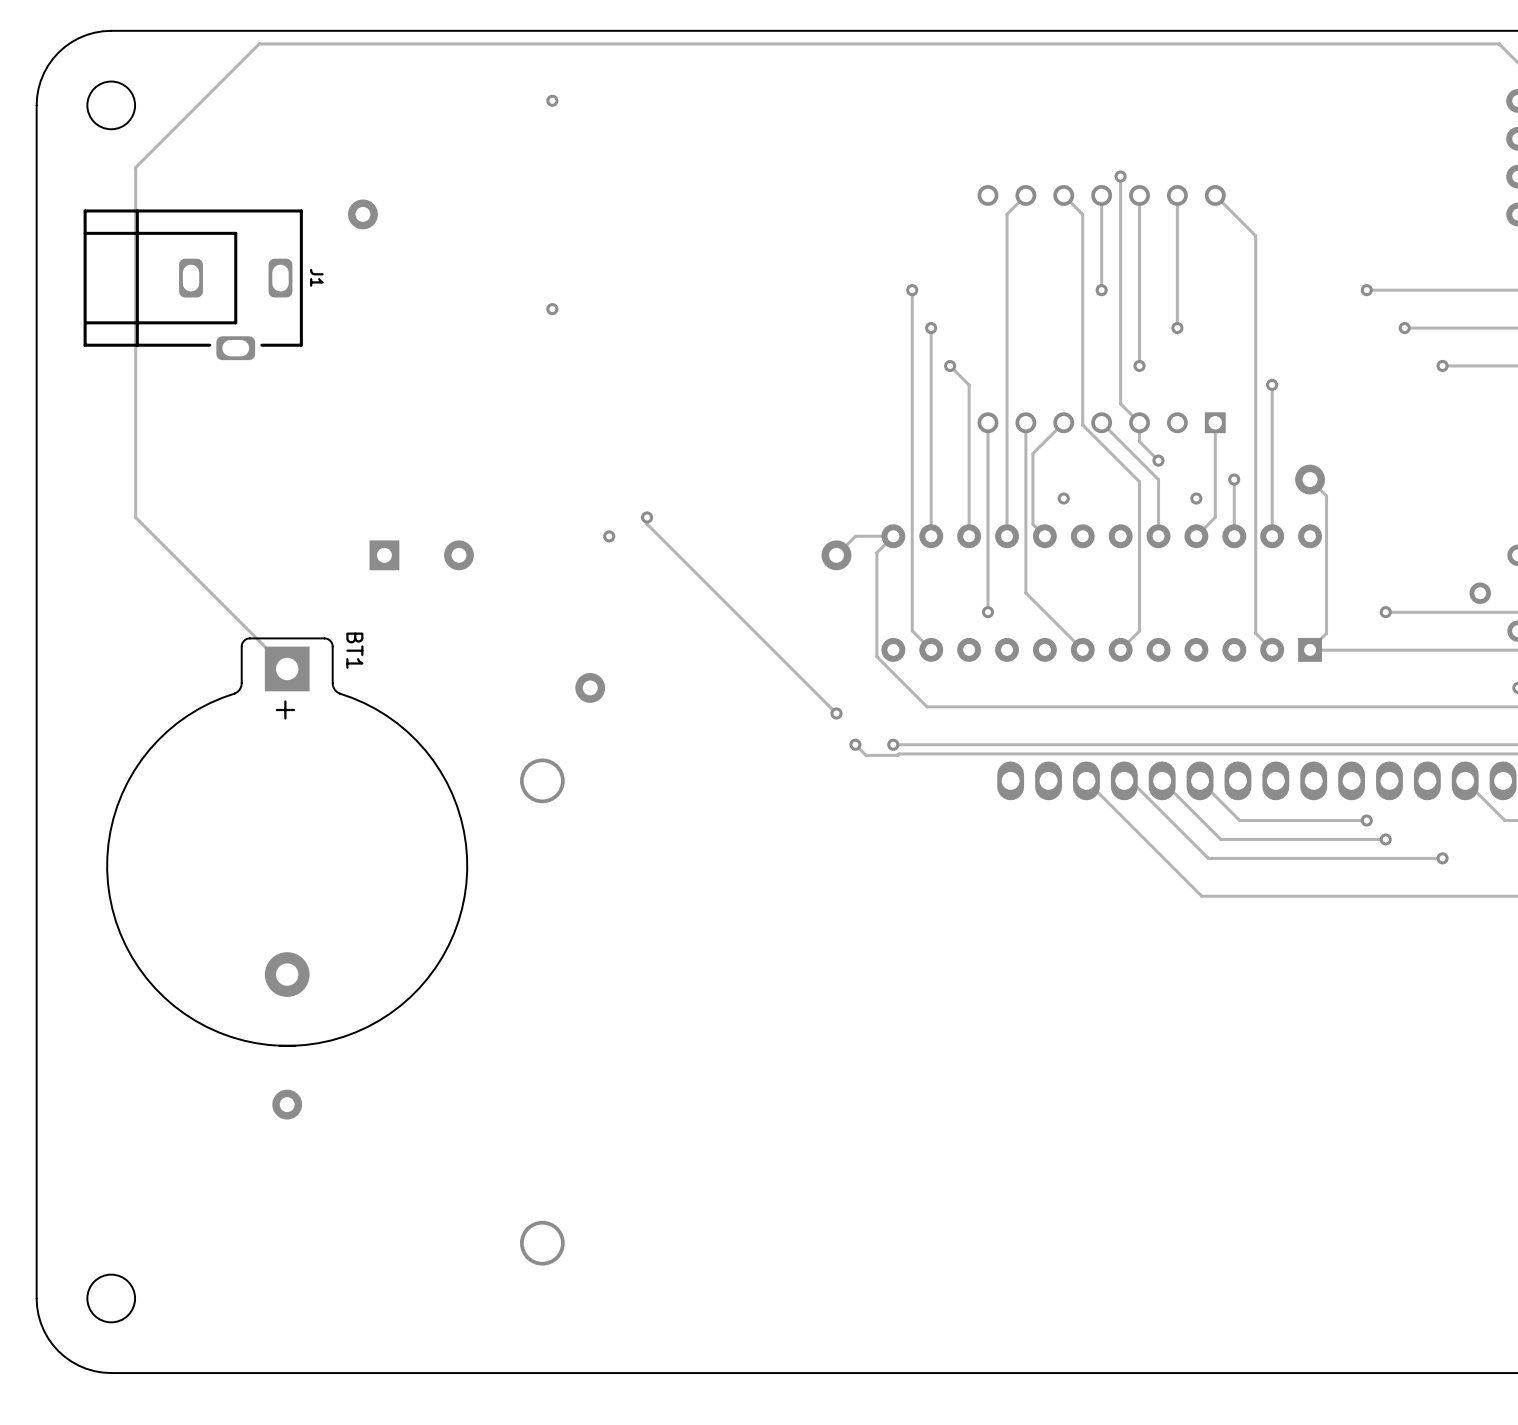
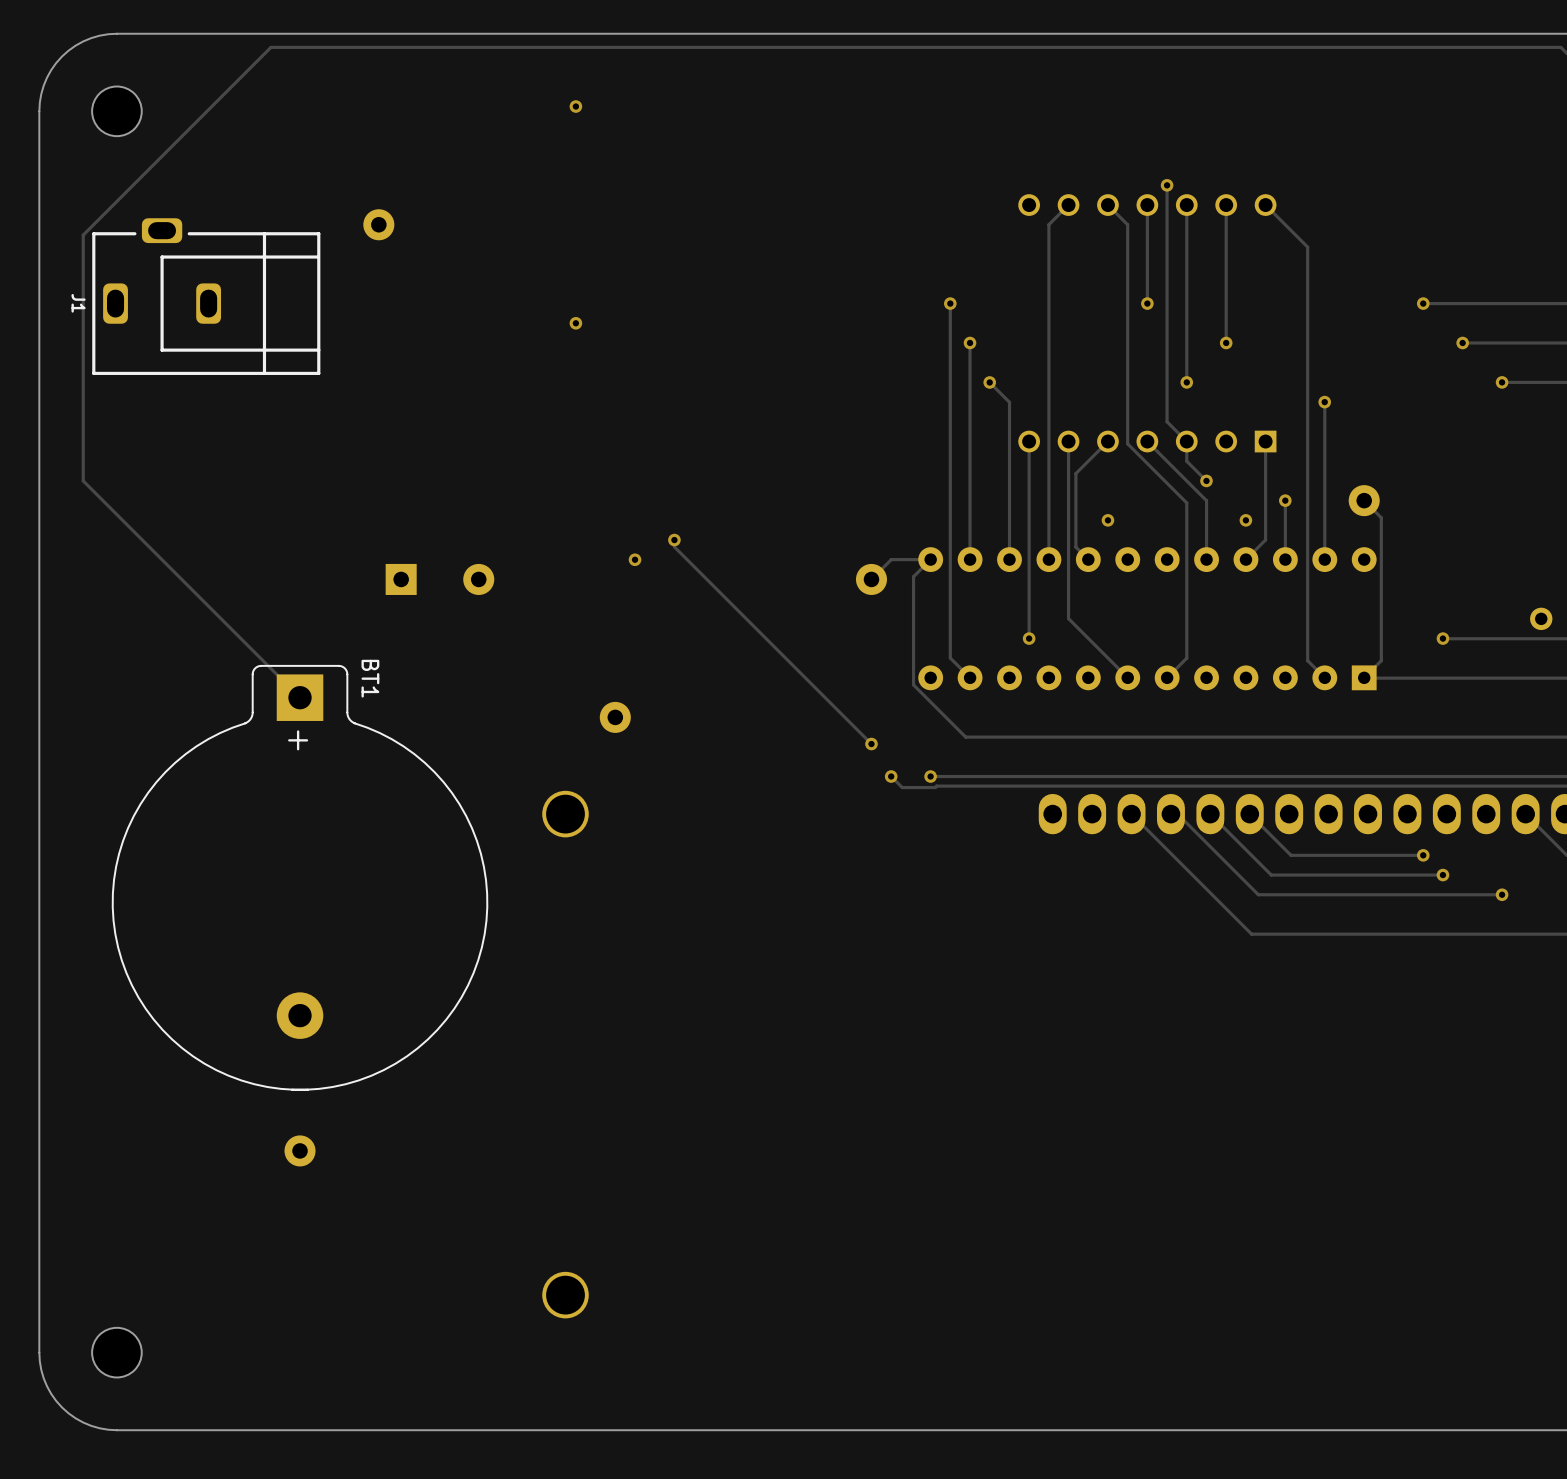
track: (135, 167) (135, 517) -> (142, 175) (83, 235) (83, 480) (142, 540)
J1 rotation: 0° (193, 284) -> 180° (206, 296)

